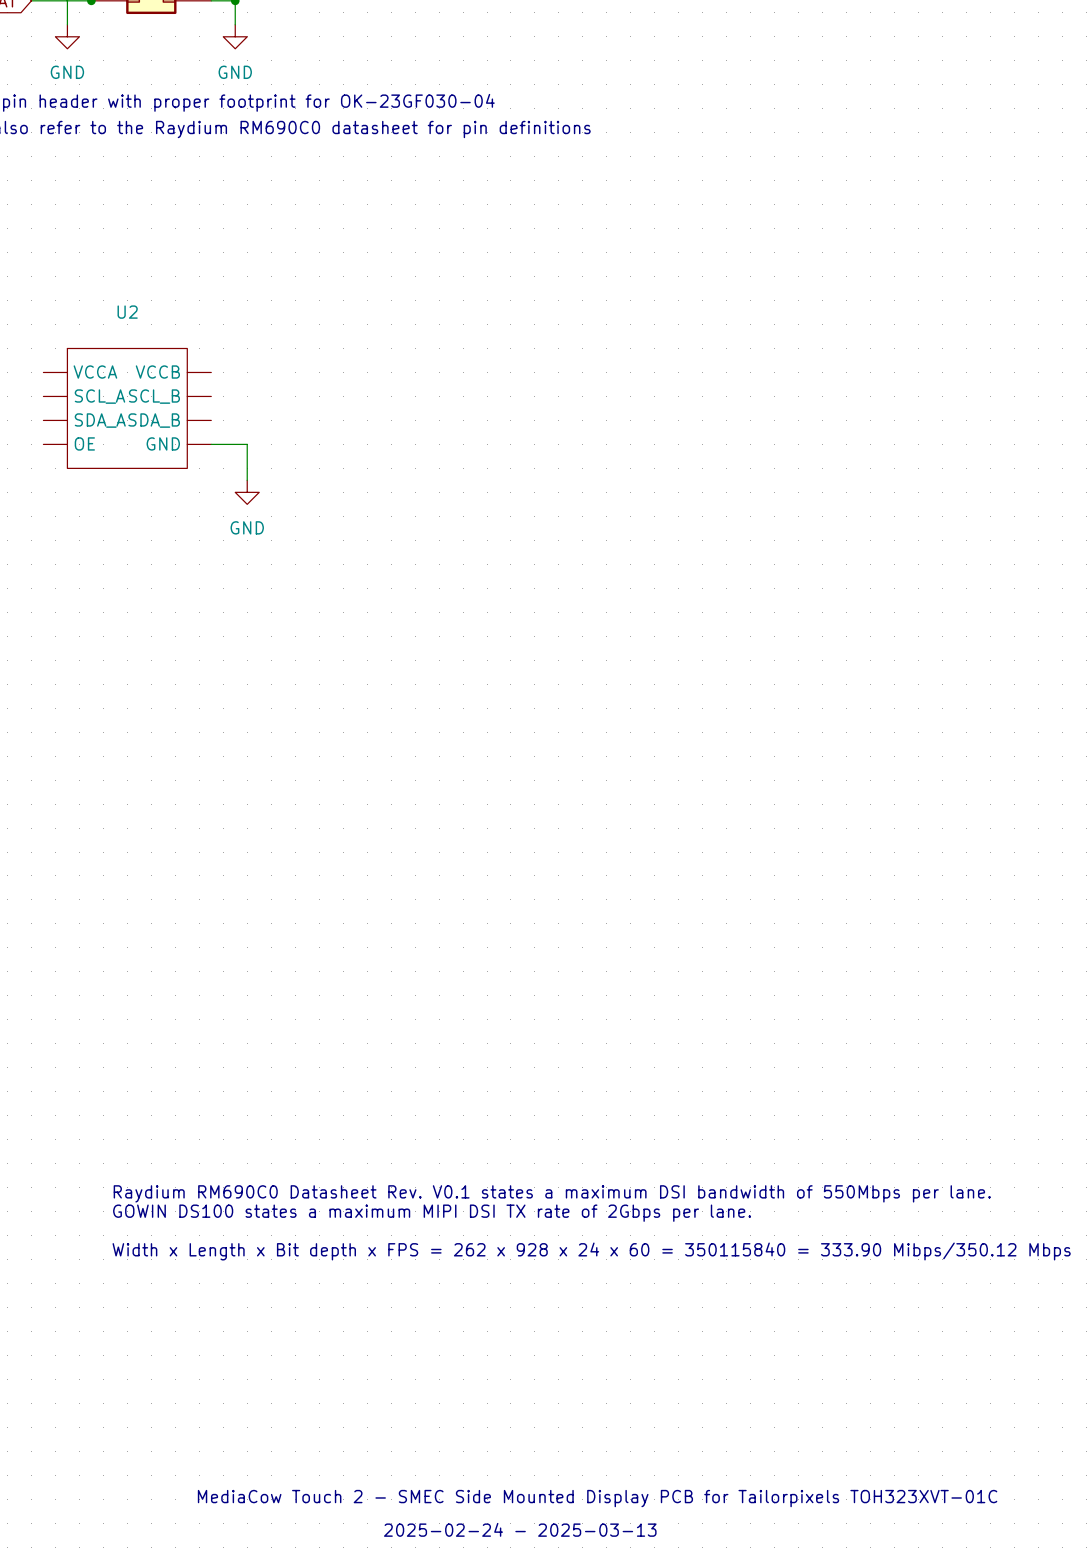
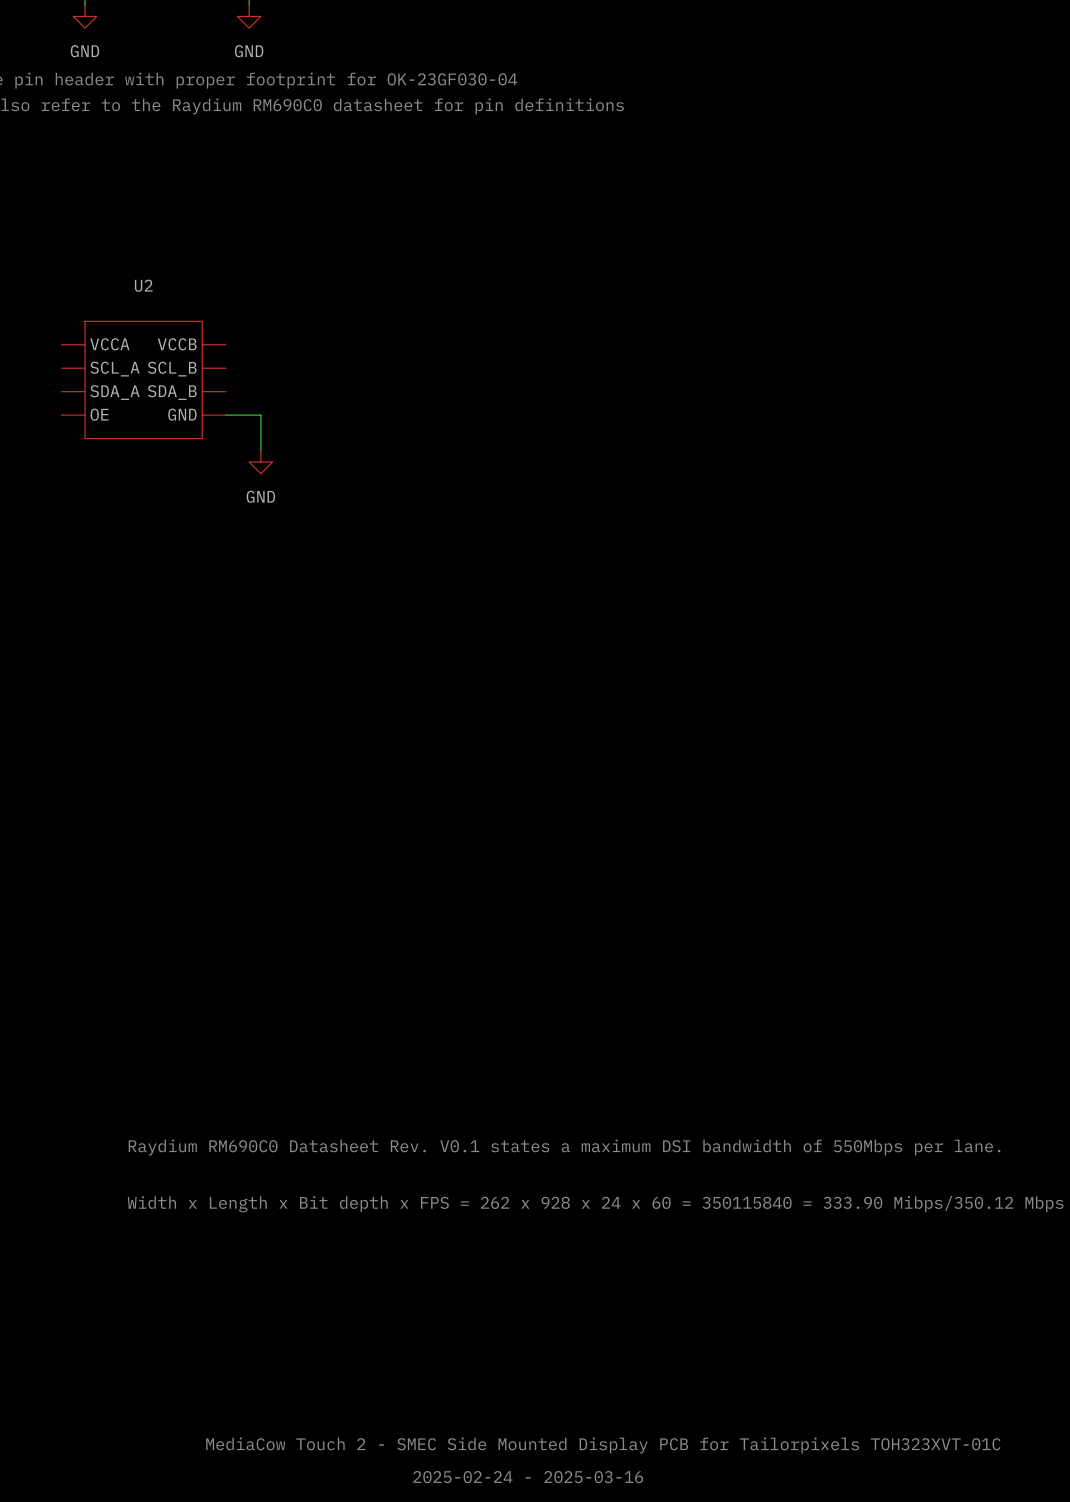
text: GOWIN DS100 states a maximum MIPI DSI TX rate of 2Gbps per lane. (432, 1213) -> none
text: 2025-02-24 - 2025-03-13 (520, 1529) -> 2025-02-24 - 2025-03-16 (528, 1477)

